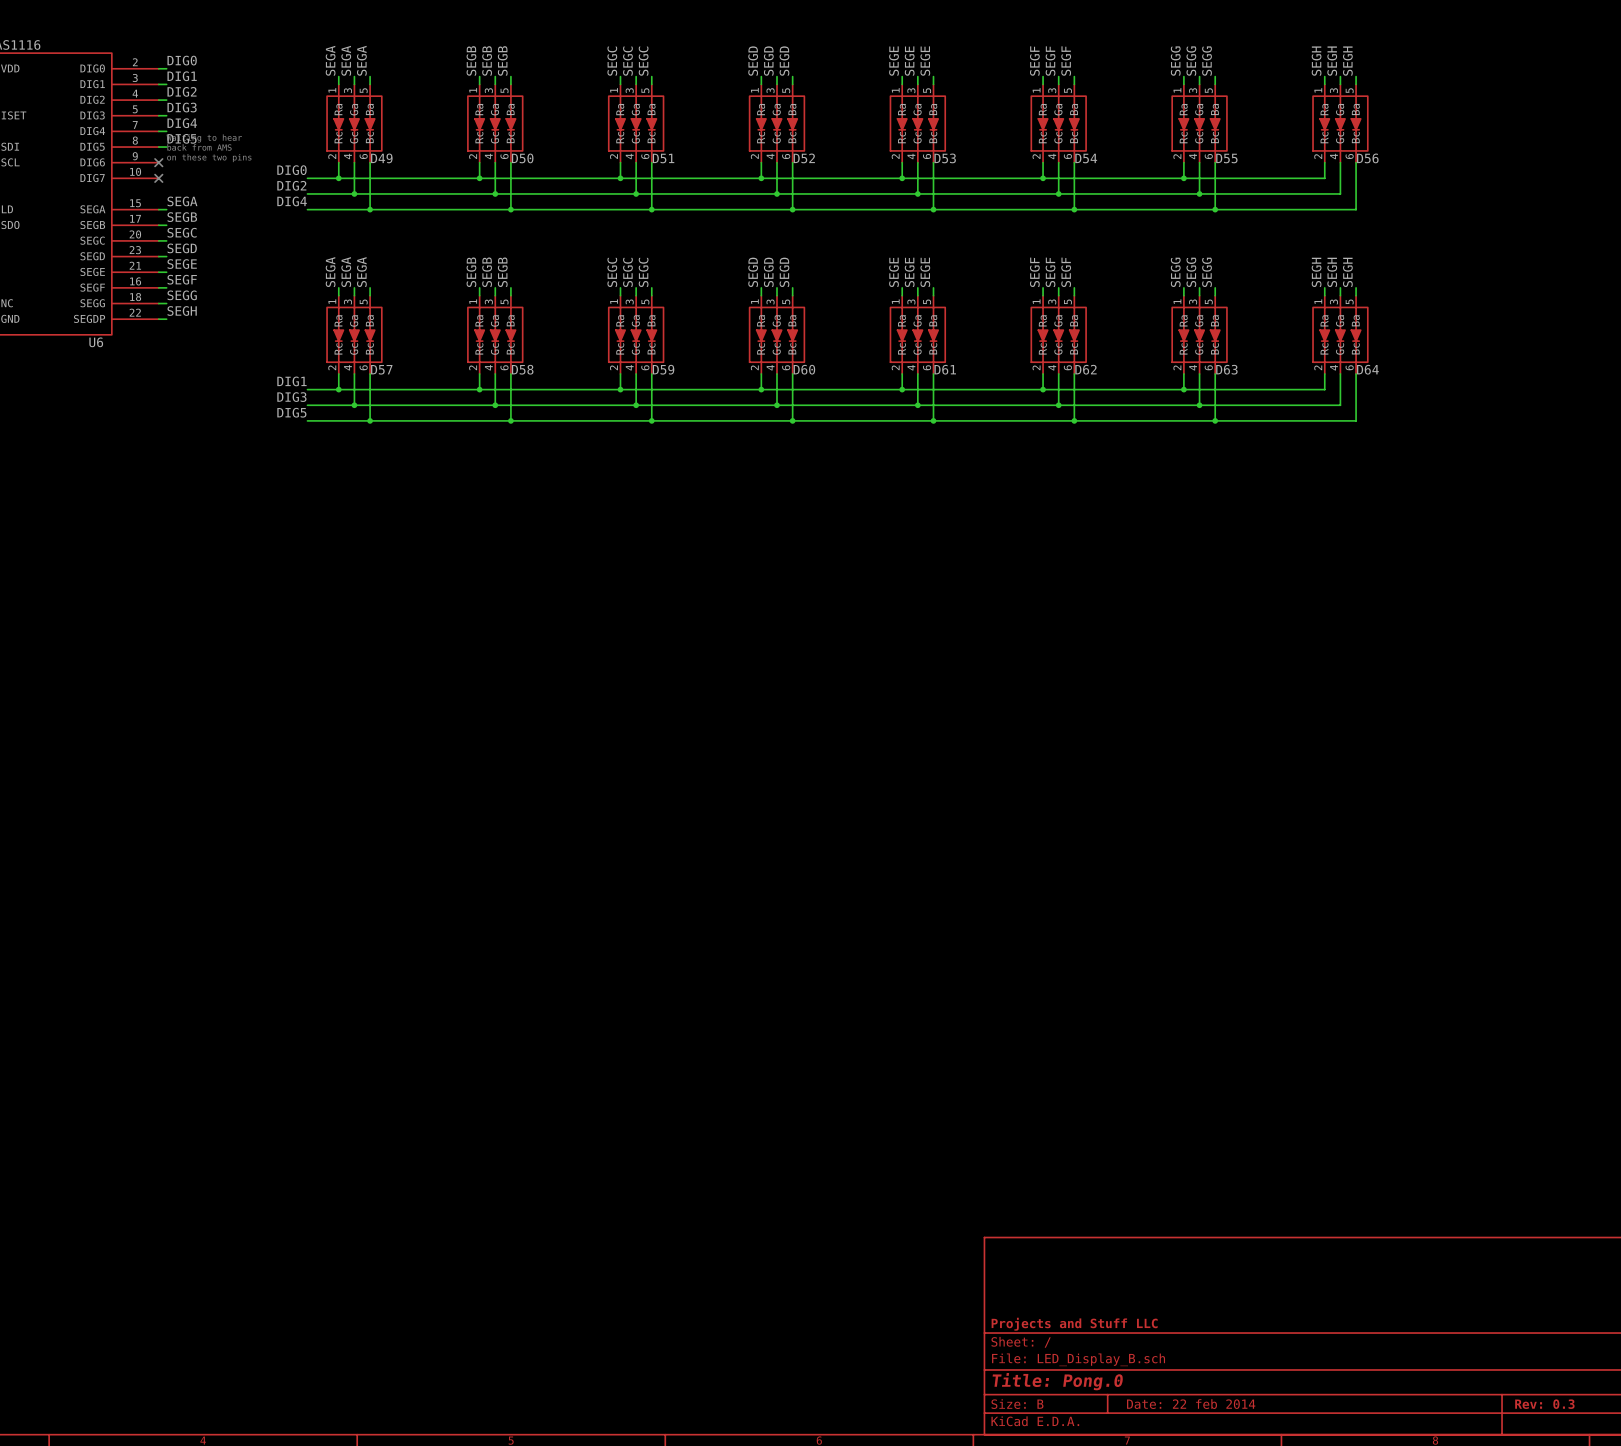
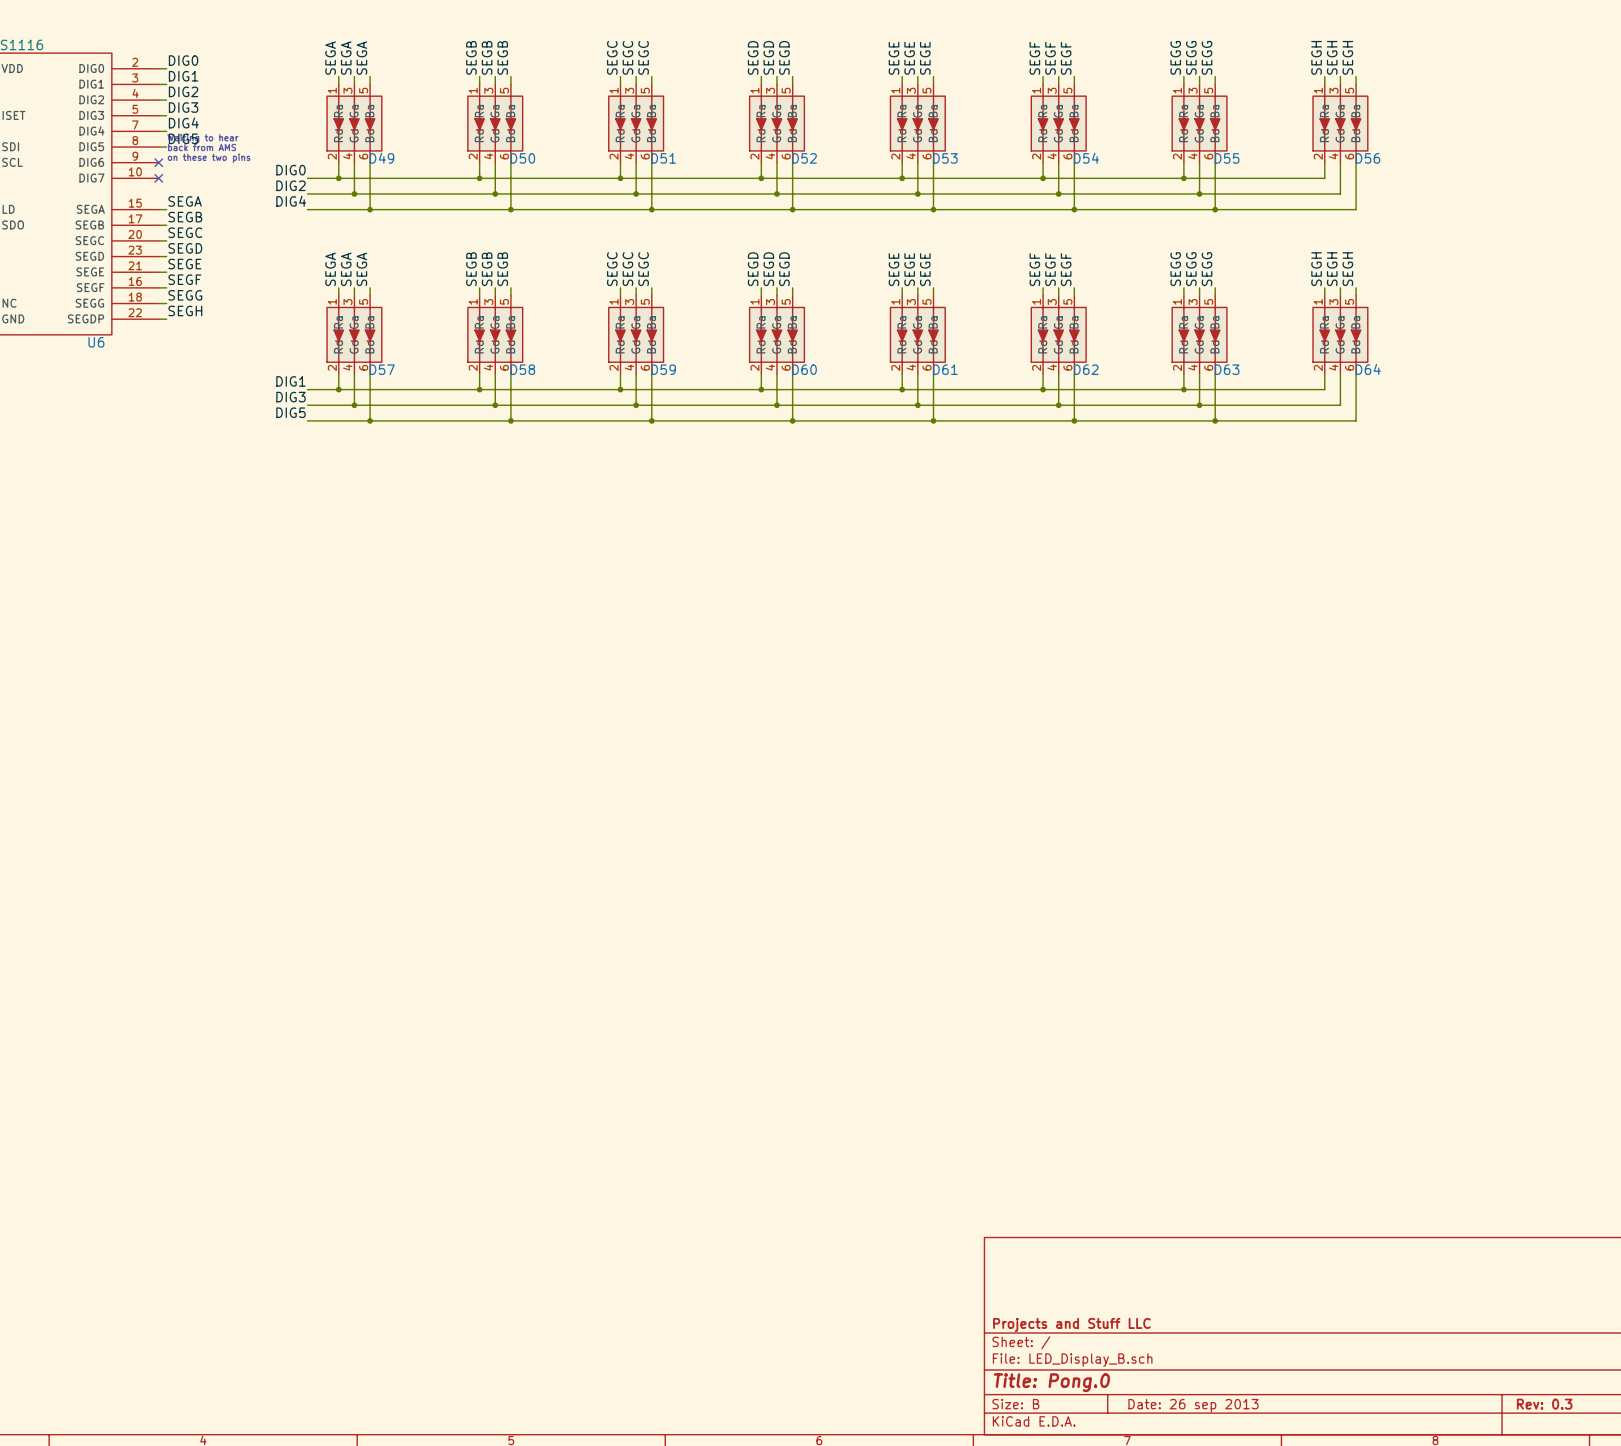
title block: Date: 22 feb 2014 (1191, 1404) -> Date: 26 sep 2013 (1193, 1405)

